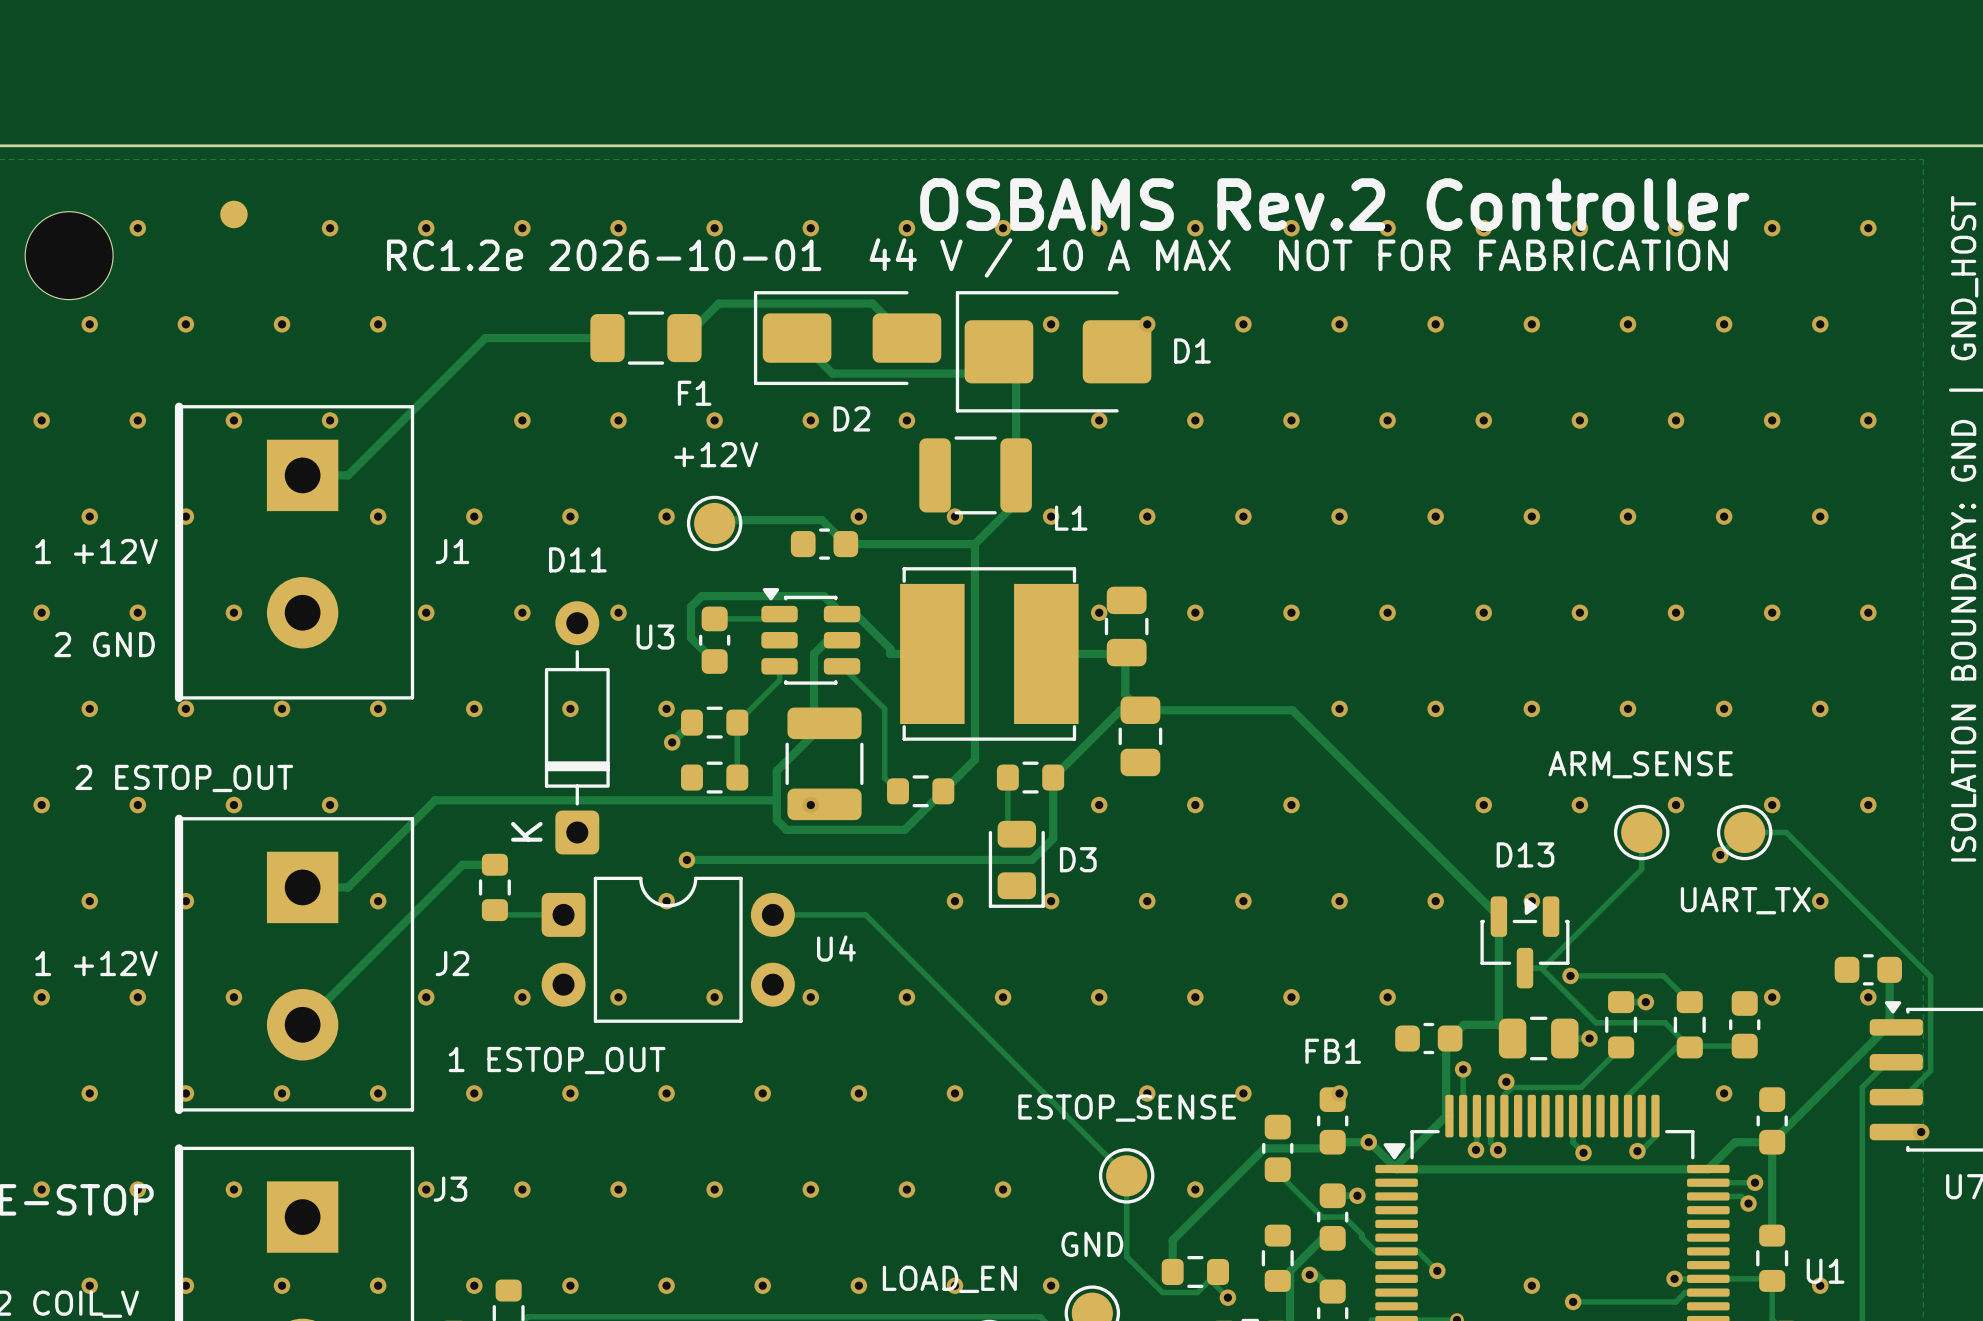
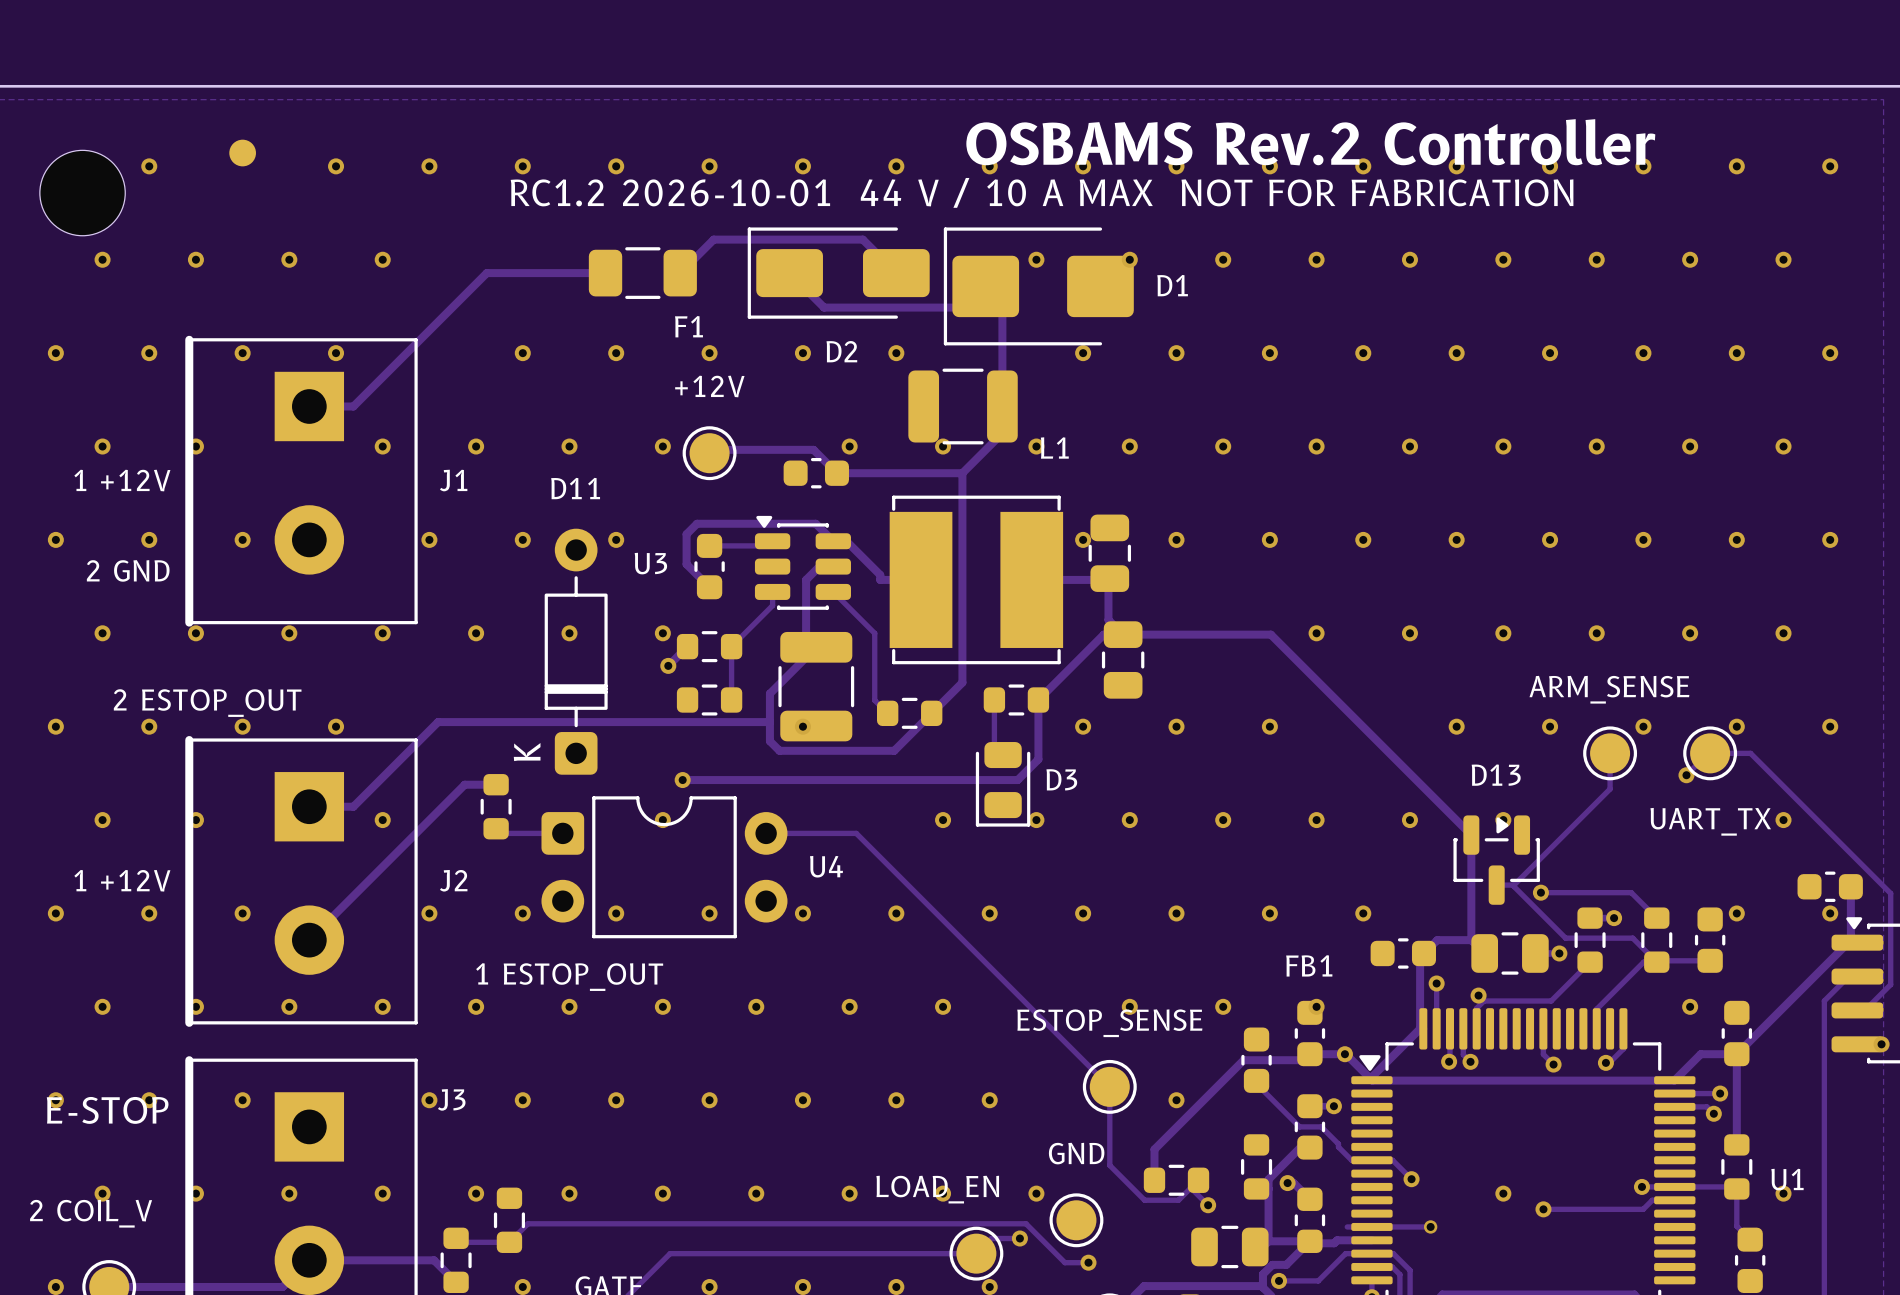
text: RC1.2e 2026-10-01 44 V / 10 A MAX NOT FOR FABRICATION (1057, 257) -> RC1.2 2026-10-01 44 V / 10 A MAX NOT FOR FABRICATION (1042, 192)

